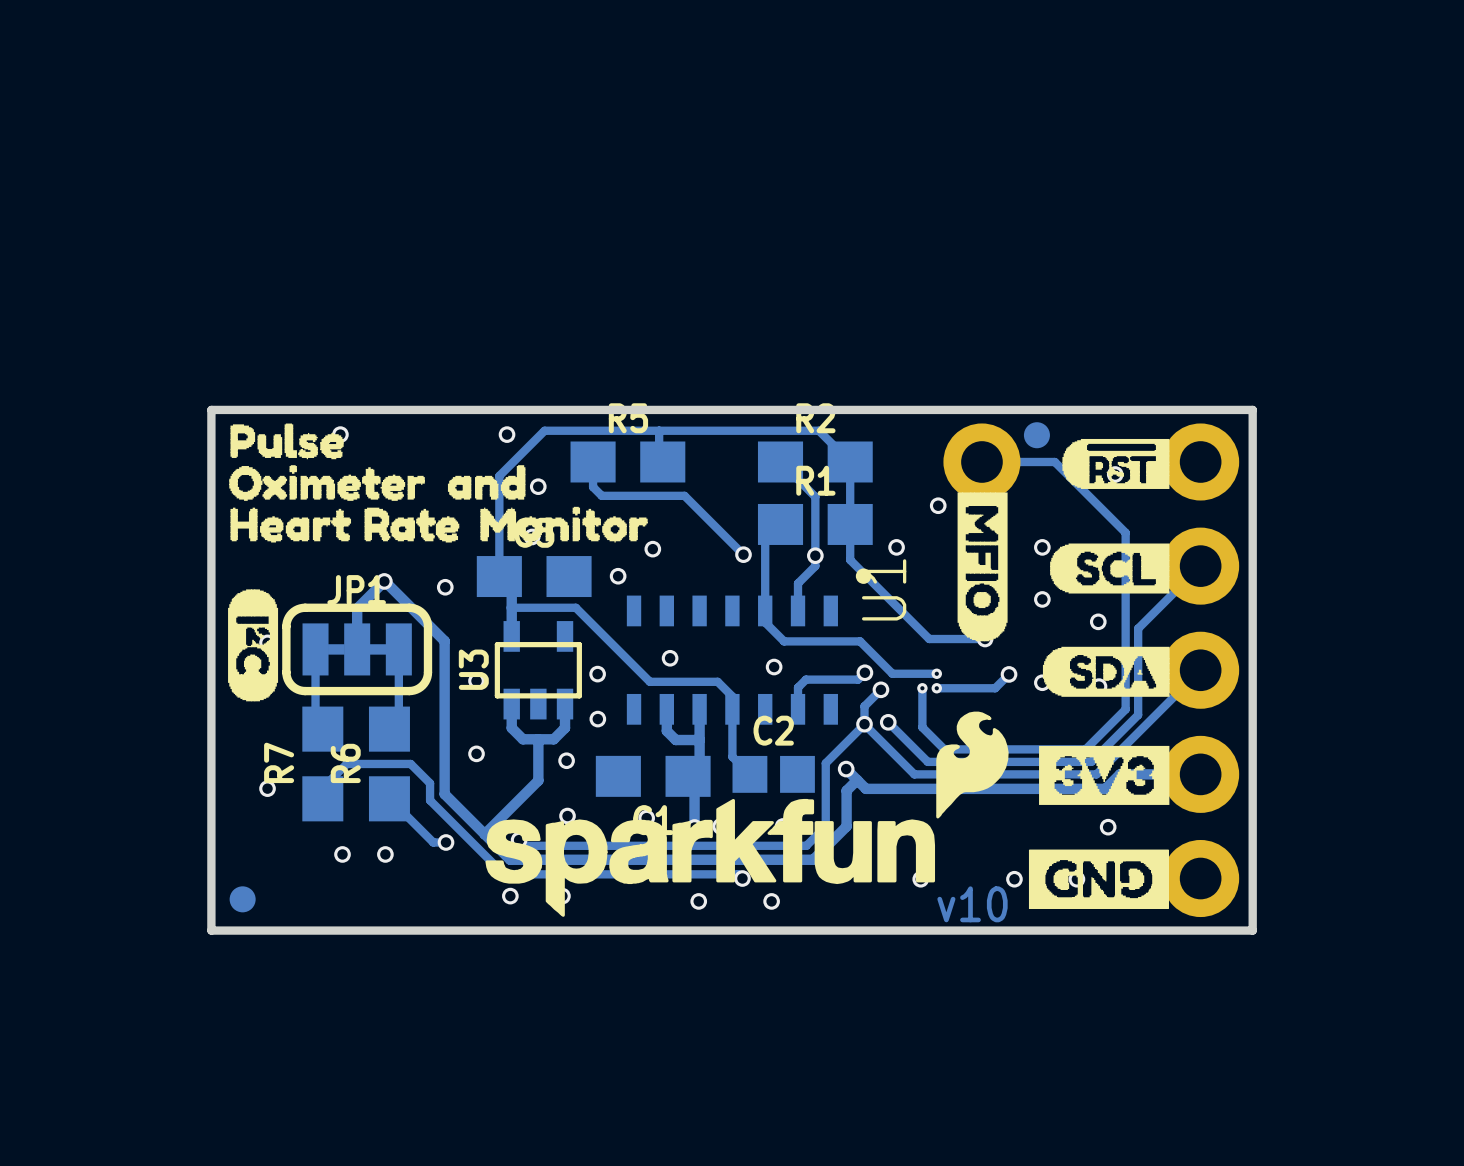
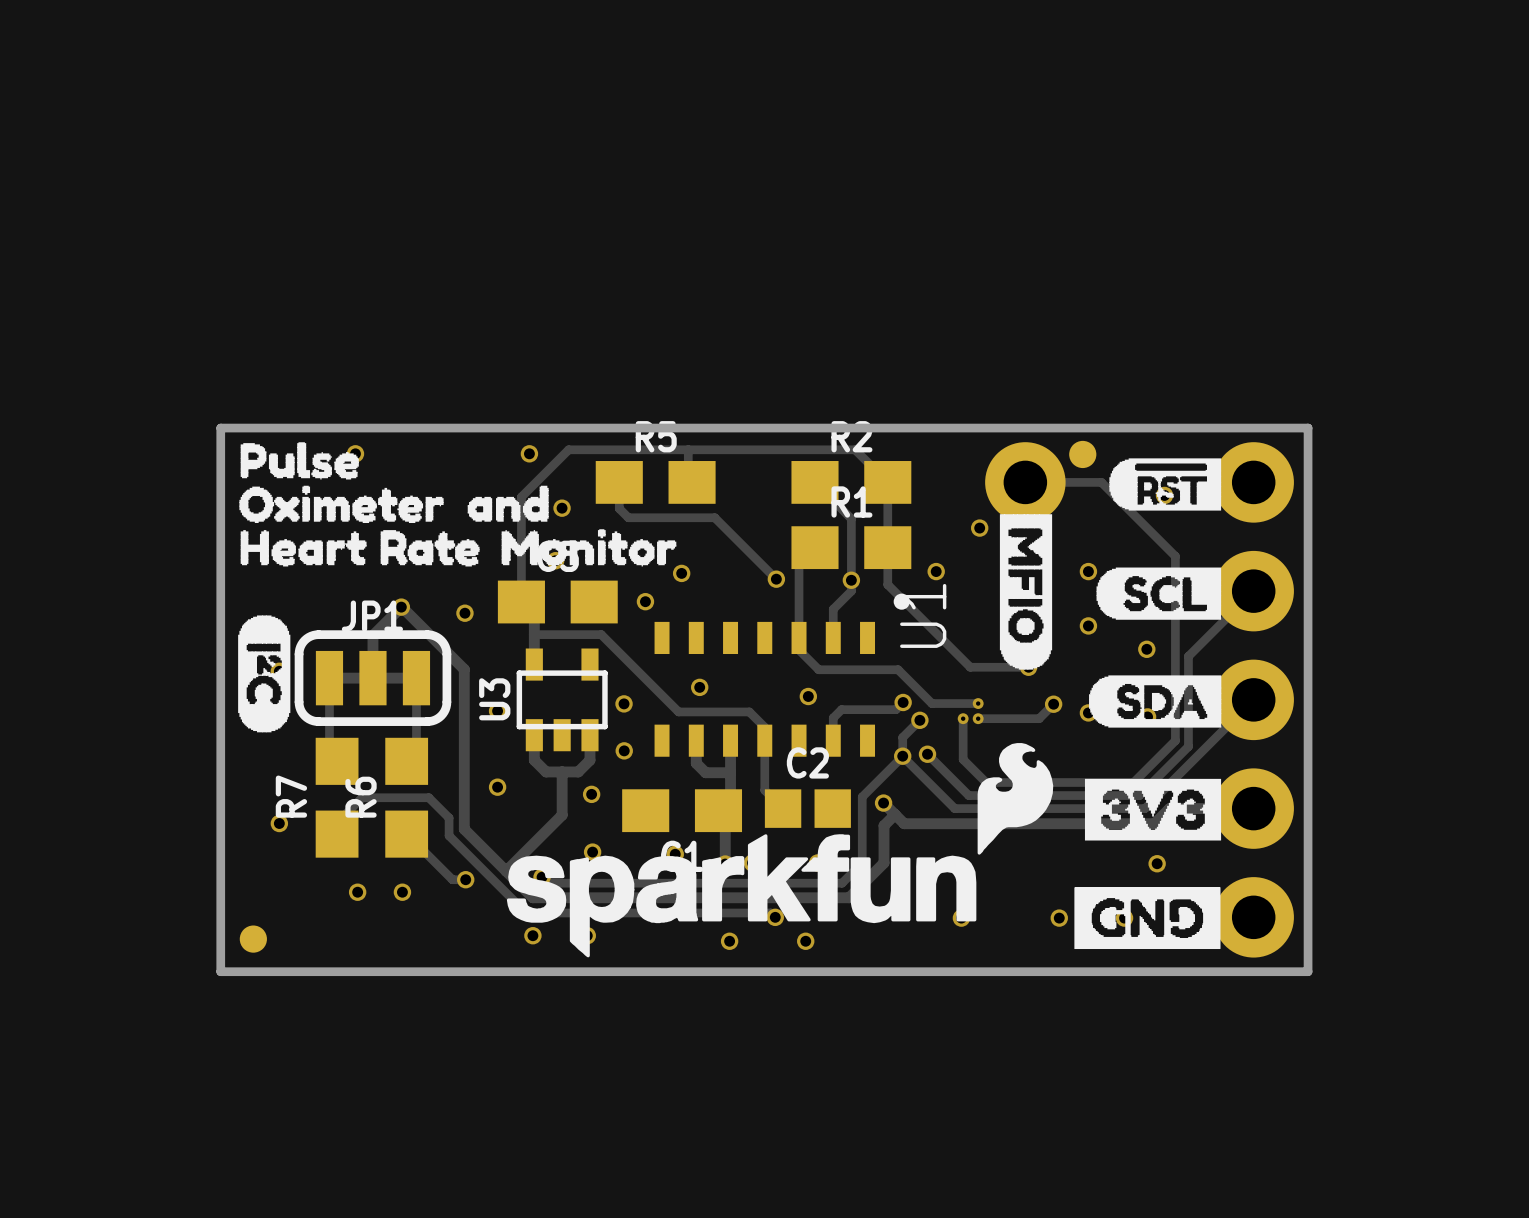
text: v10 (972, 904) -> none

